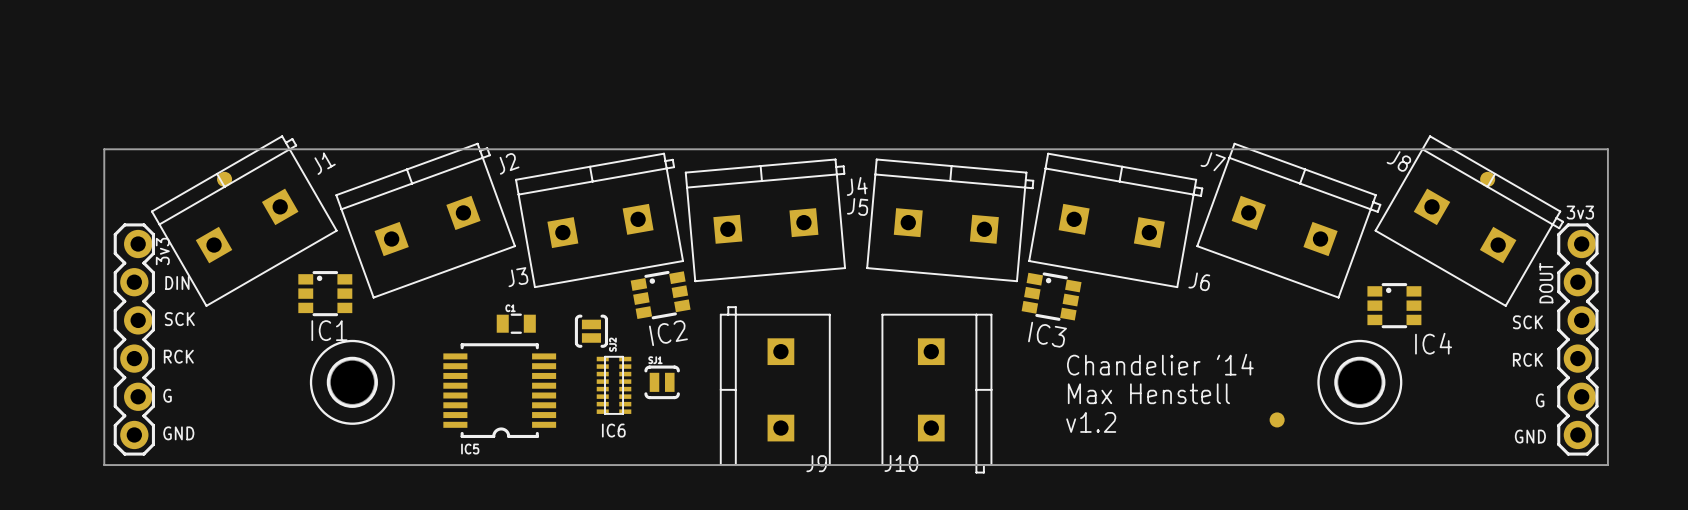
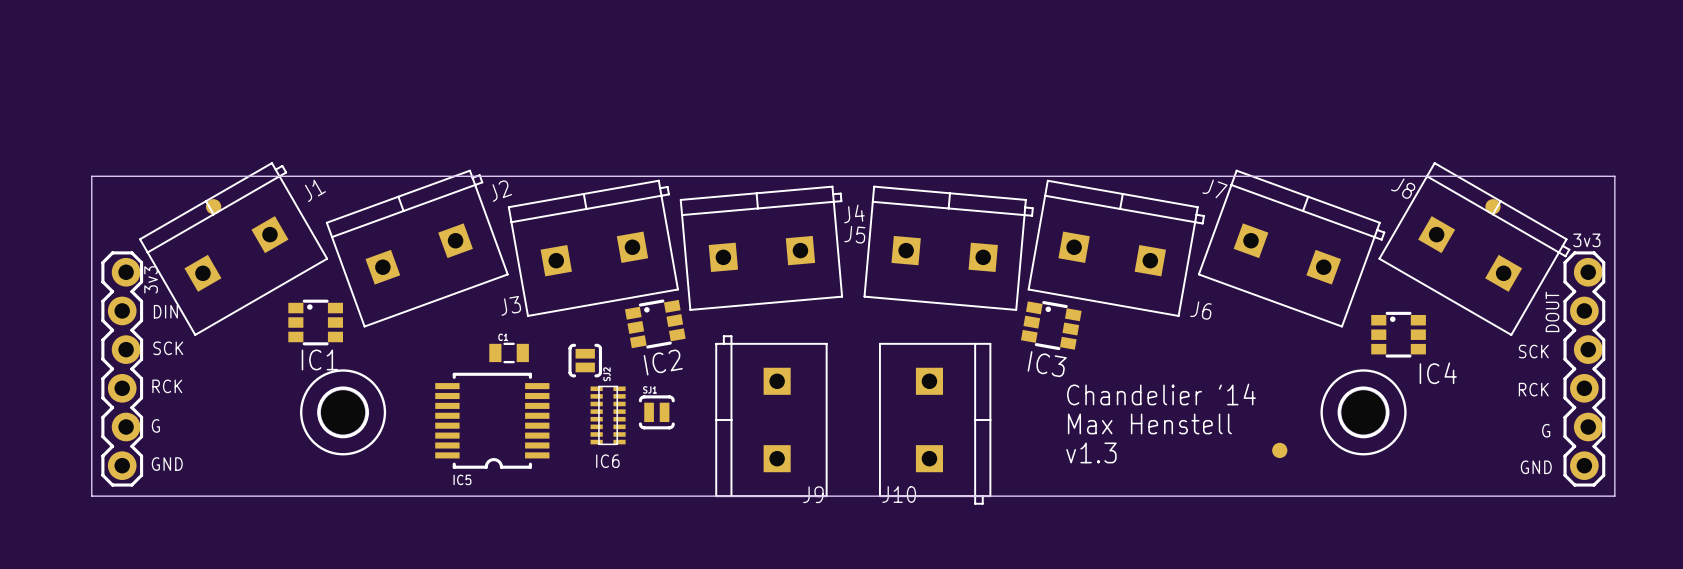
text: v1.2 (1091, 422) -> v1.3 (1091, 452)

